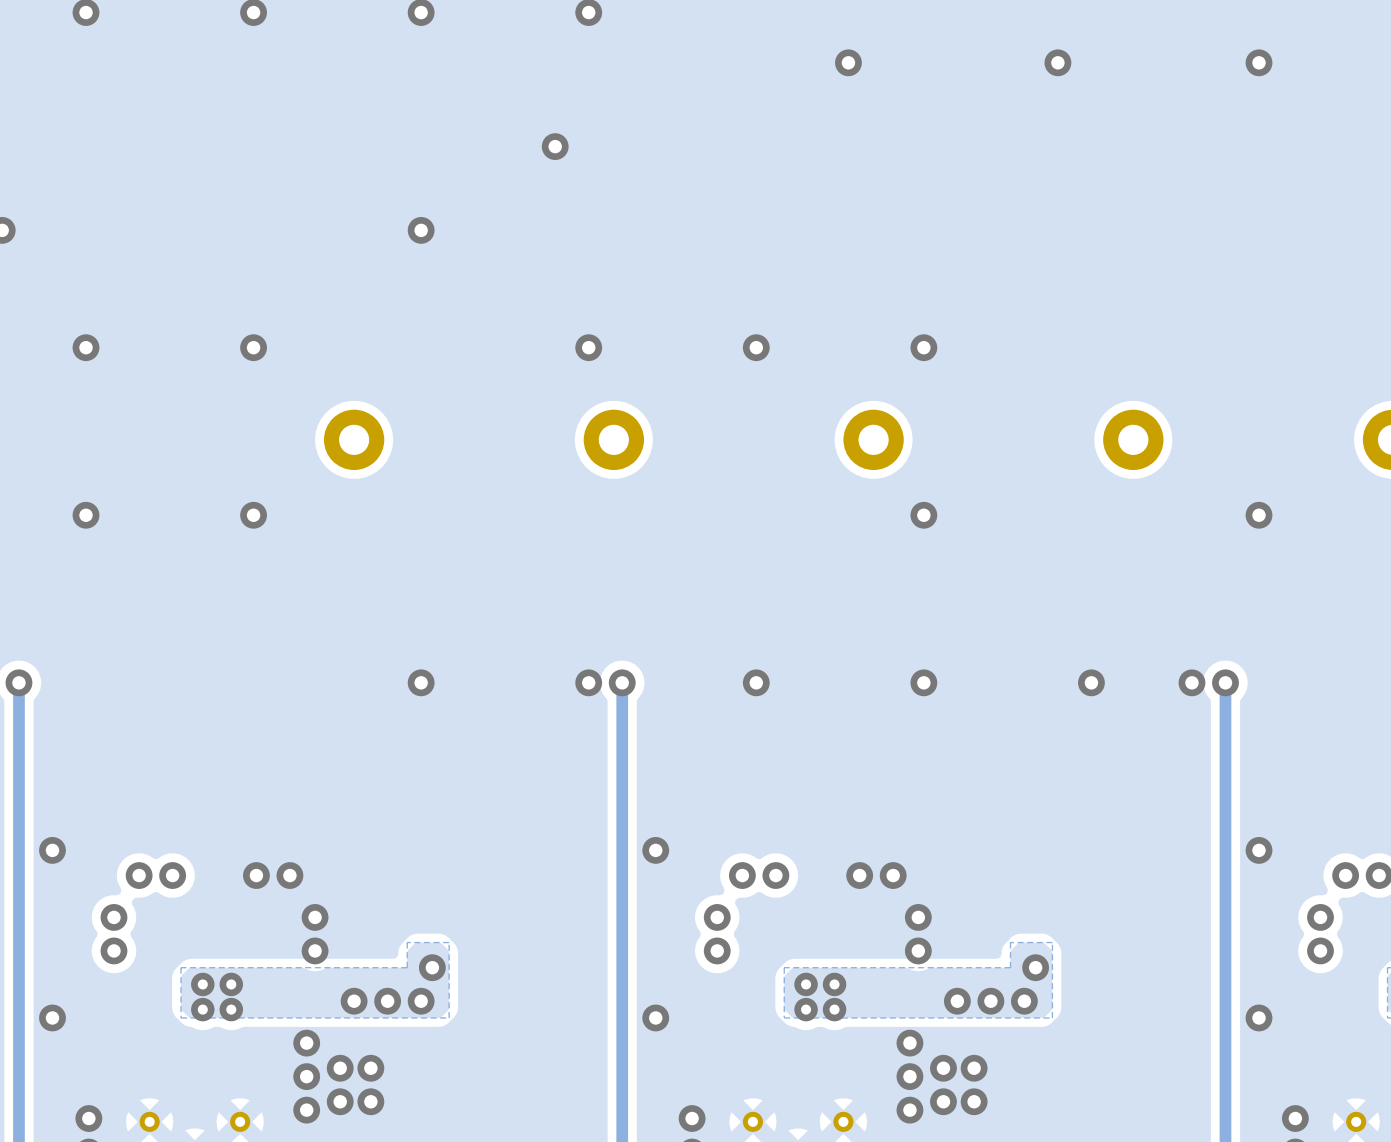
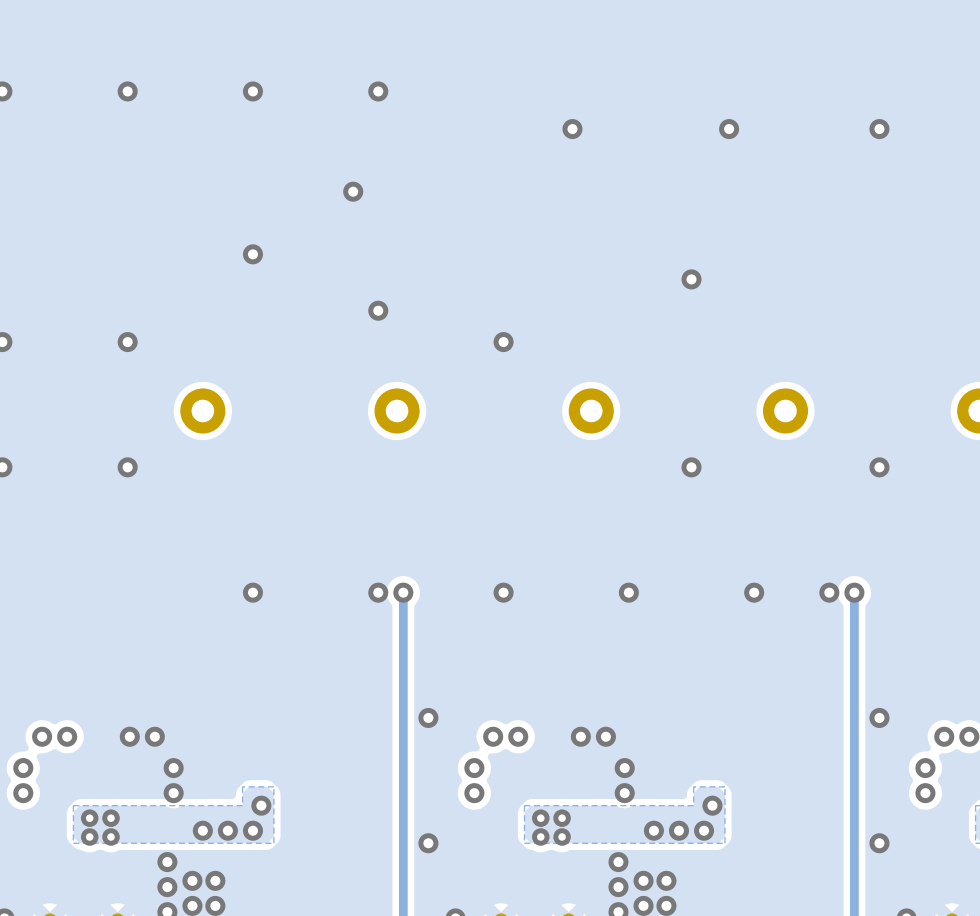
via: none -> (691, 279)
via position: (588, 347) -> (378, 310)
via: (923, 347) -> none
via position: (923, 515) -> (691, 467)

